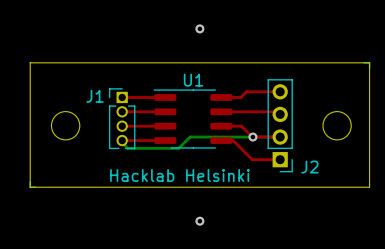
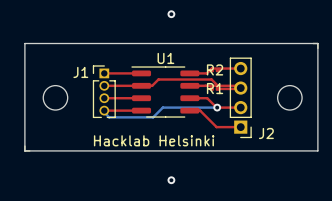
R2: none -> (214, 70)
top track: none -> (141, 85) (152, 85) (158, 79) (211, 79) (217, 85) (217, 88) (245, 88)
R1: none -> (214, 88)

